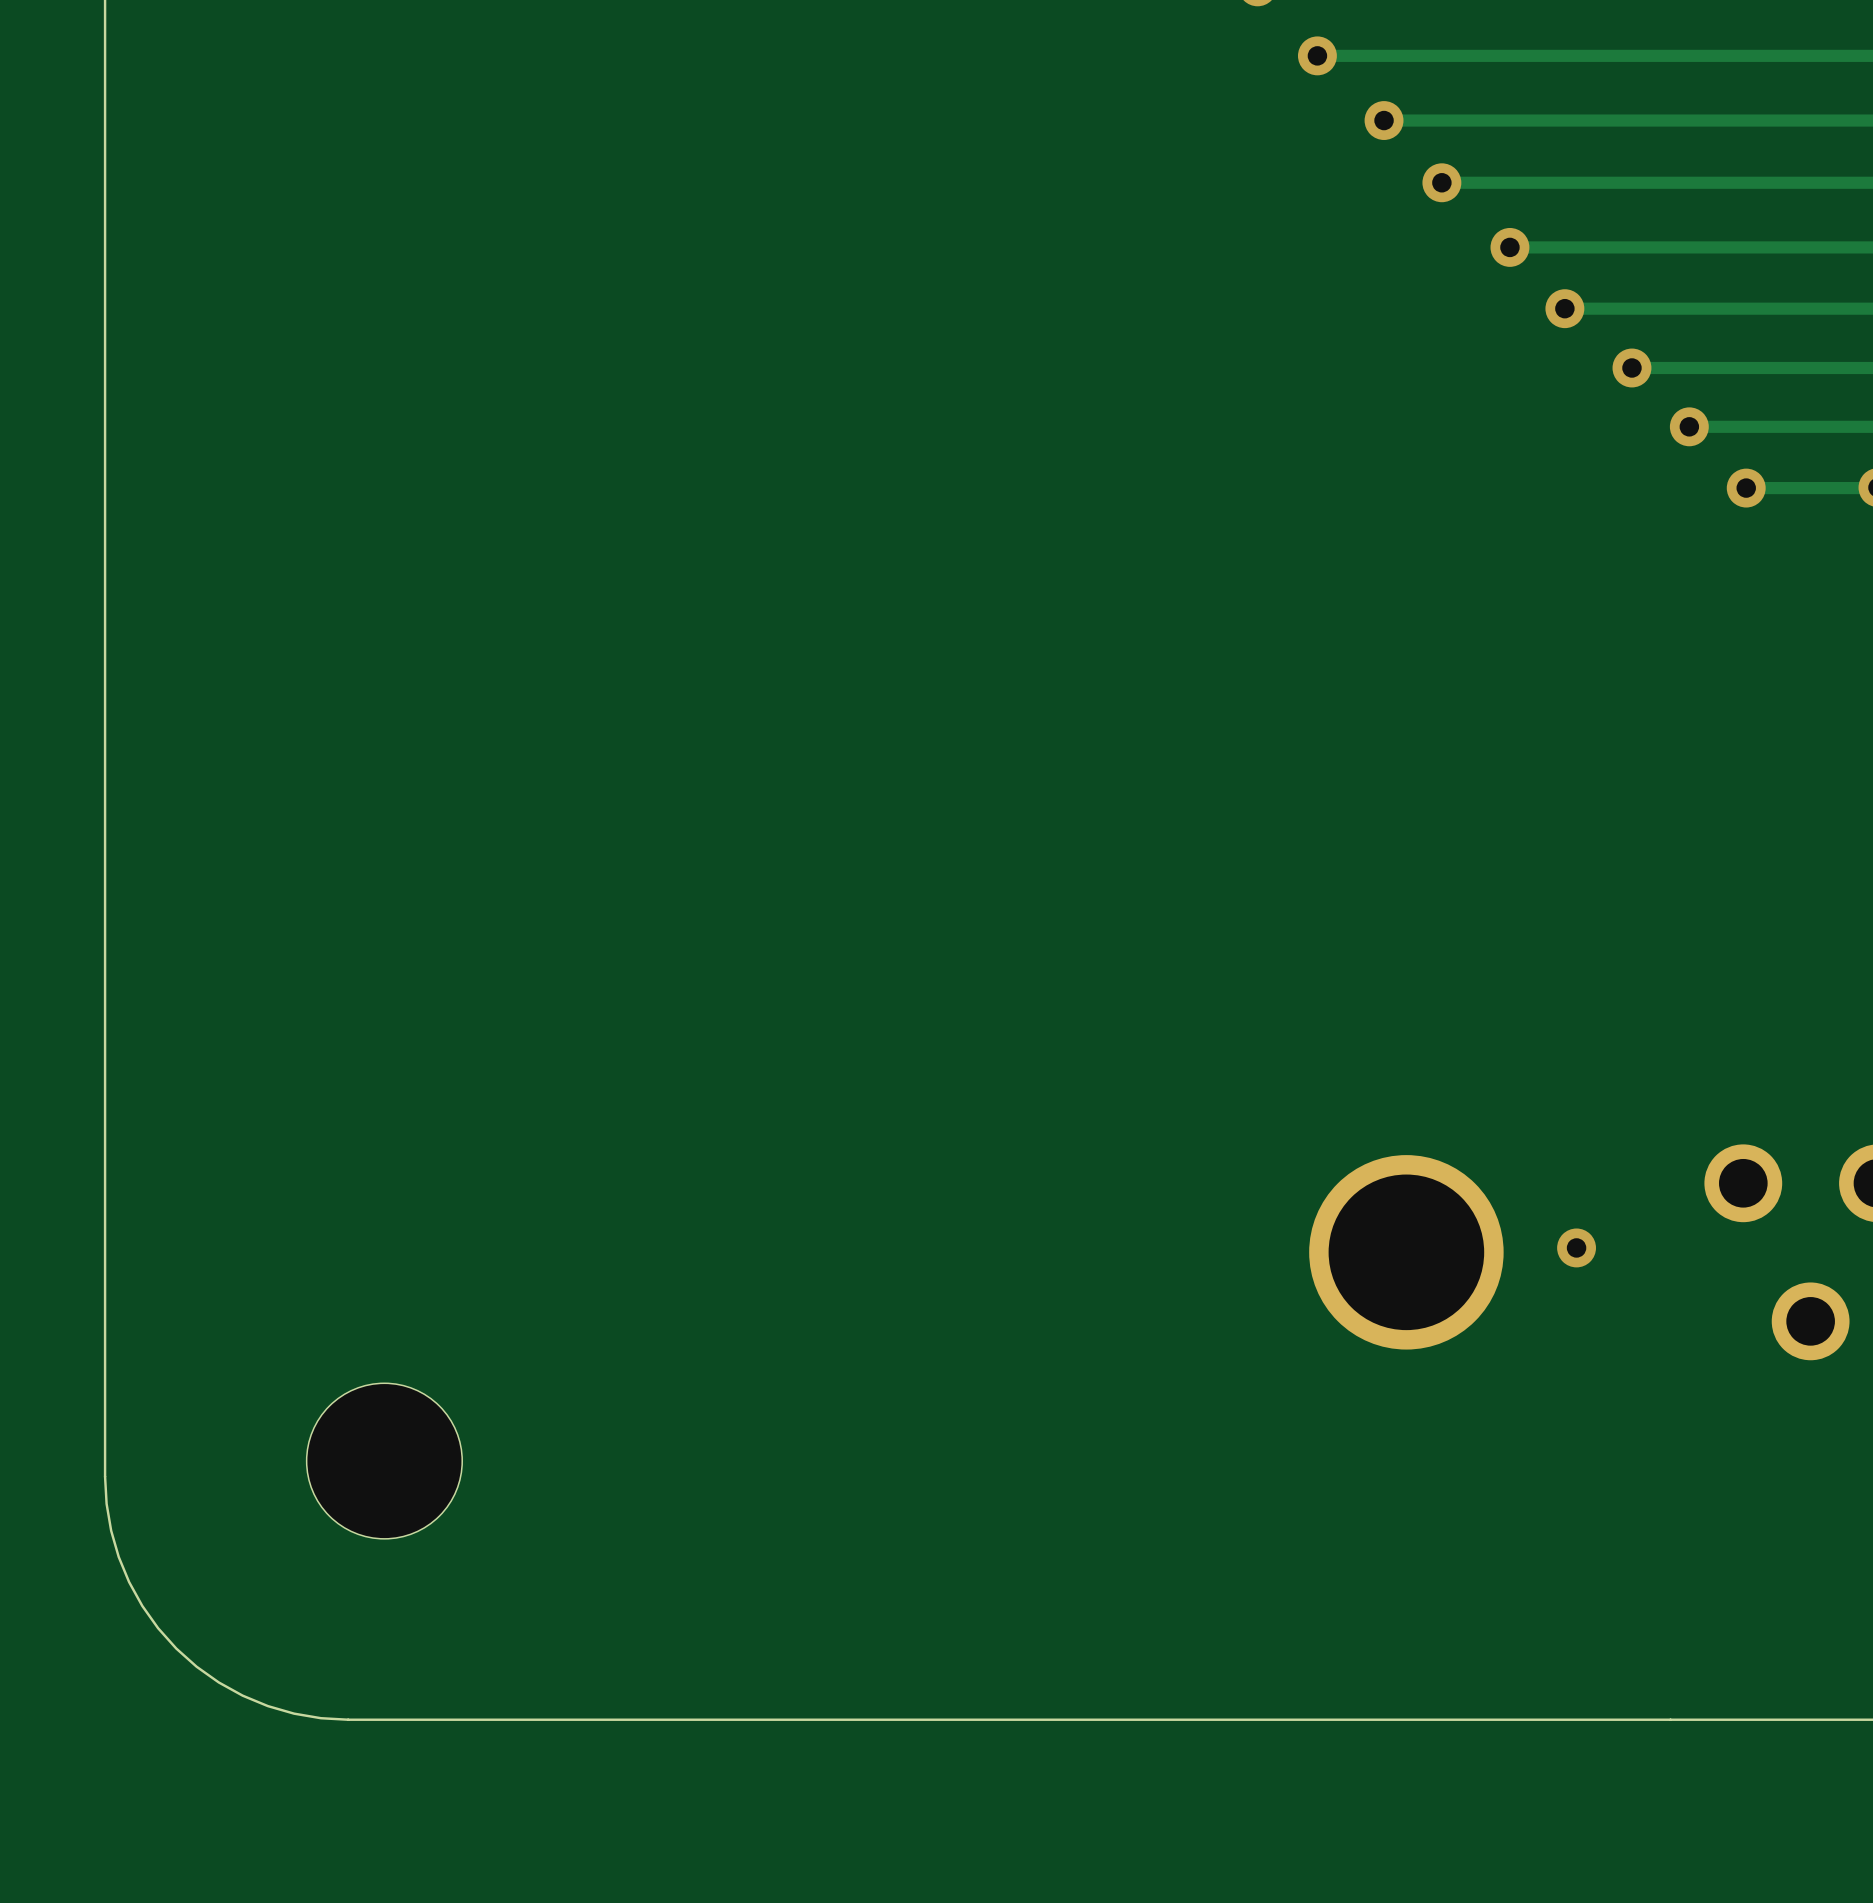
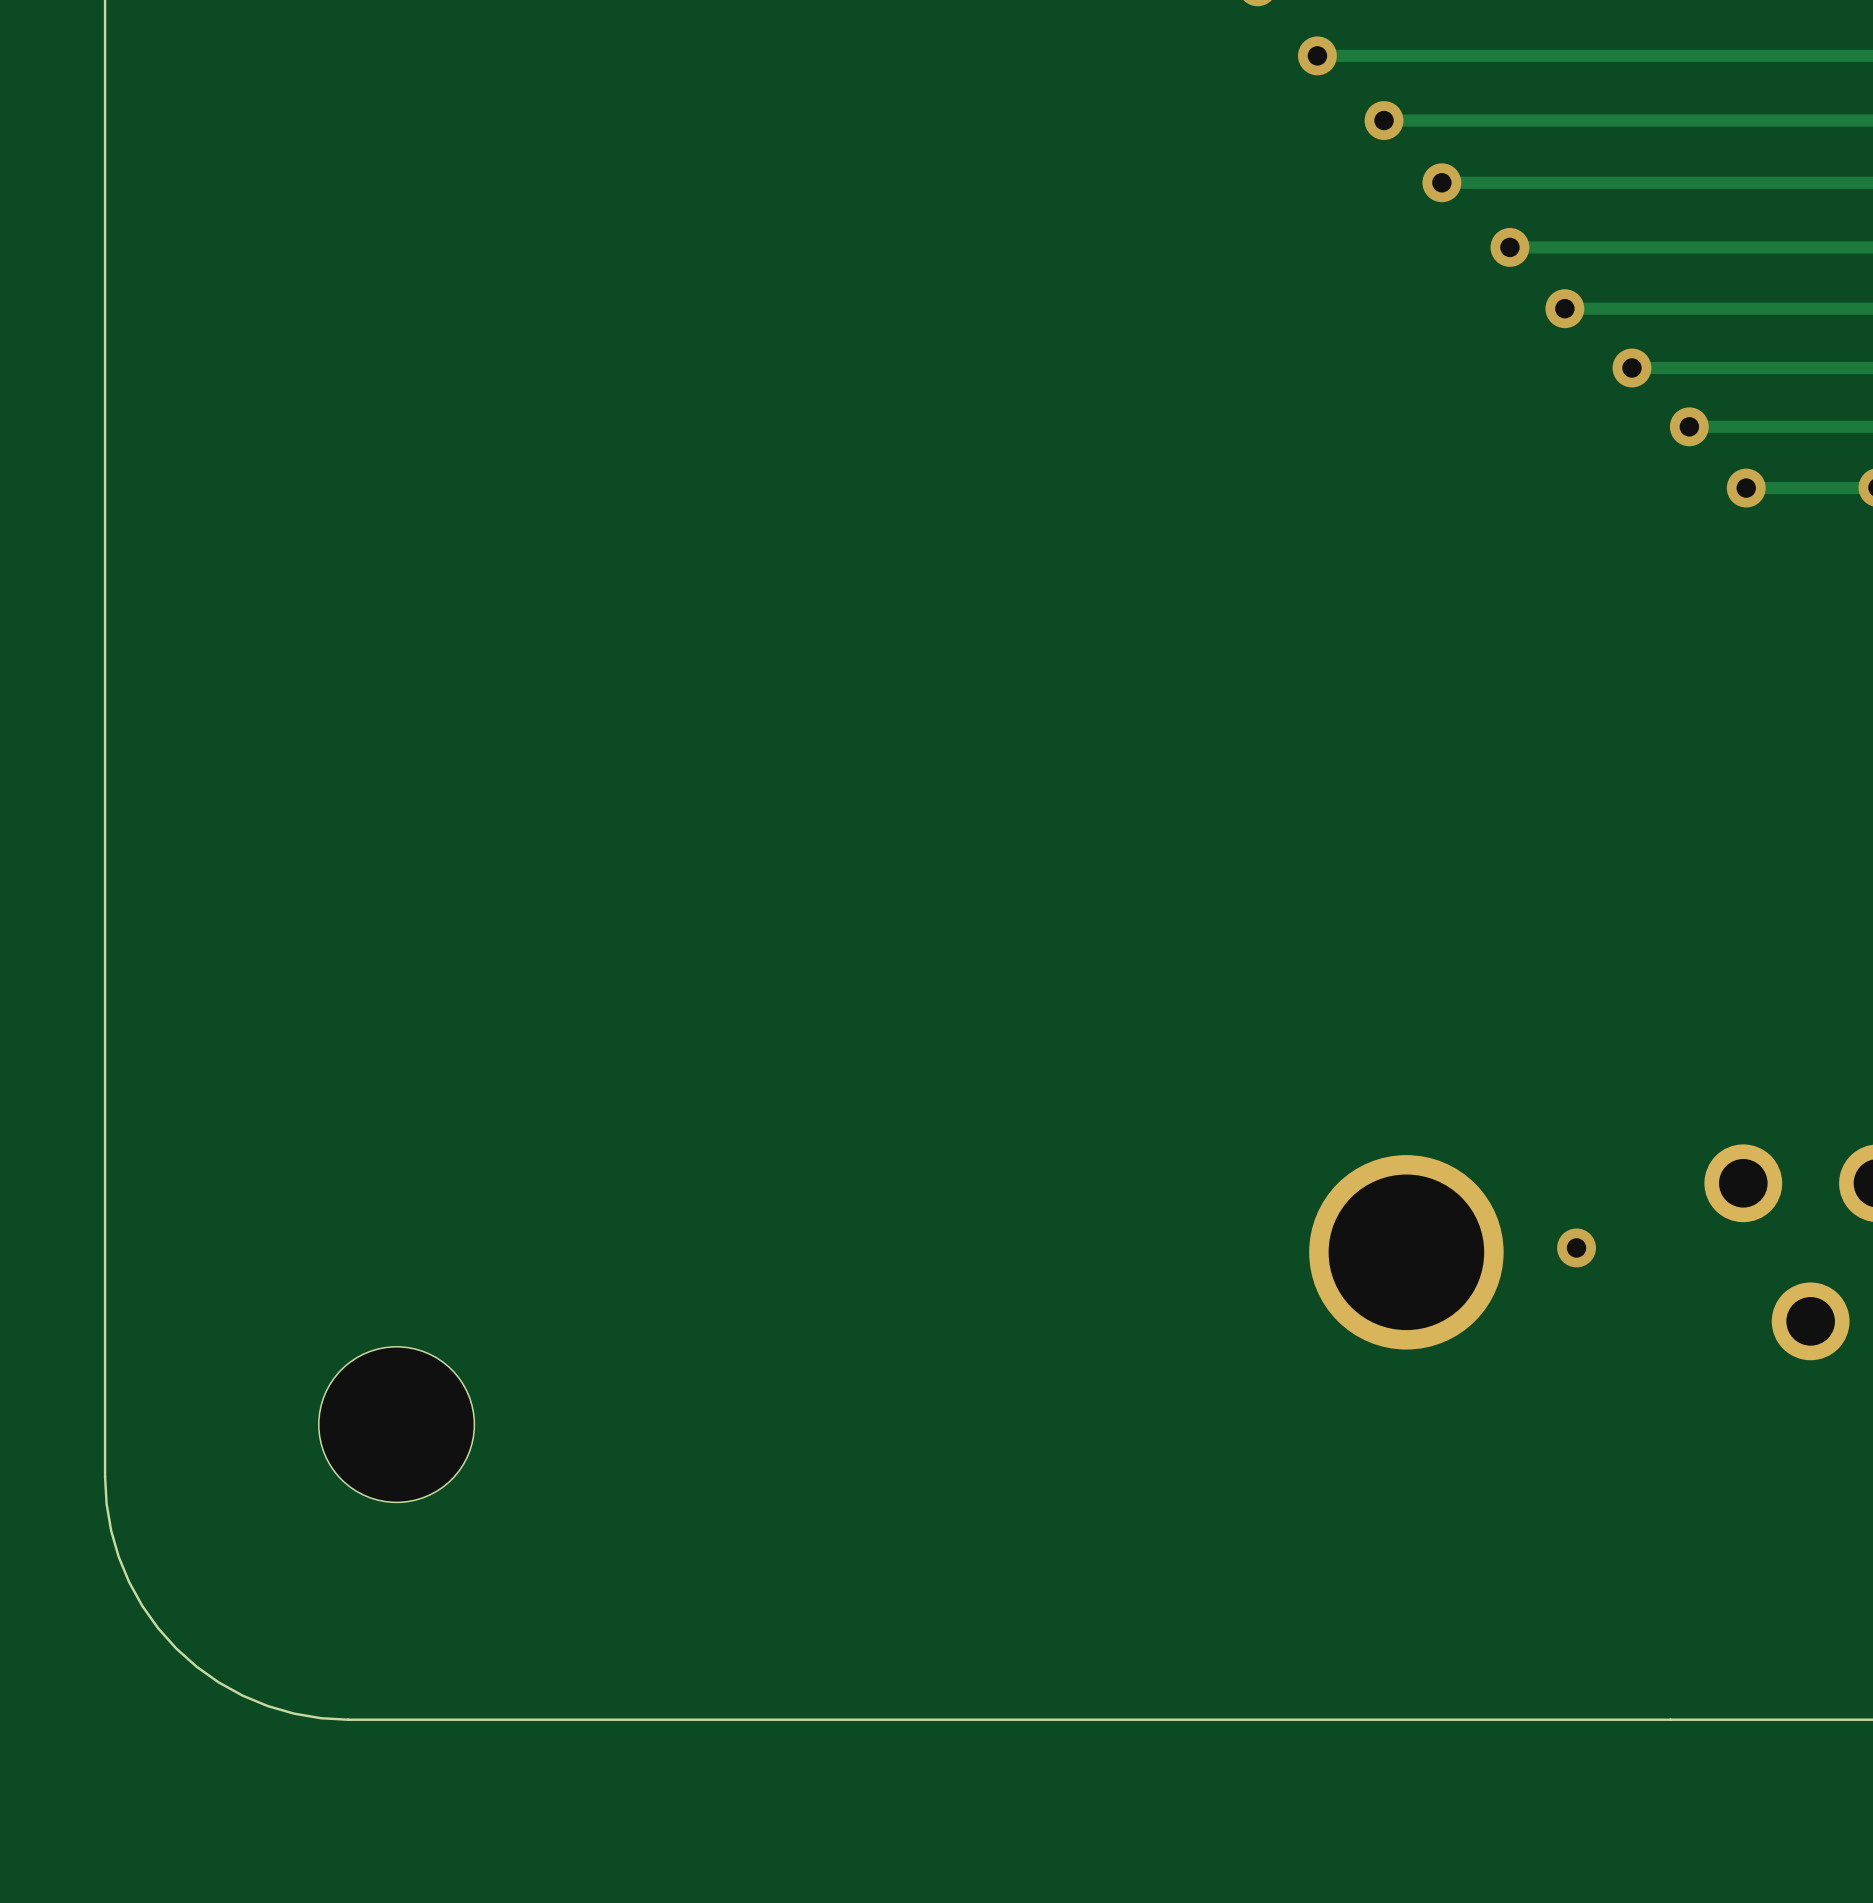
part position: (384, 1461) -> (396, 1424)

